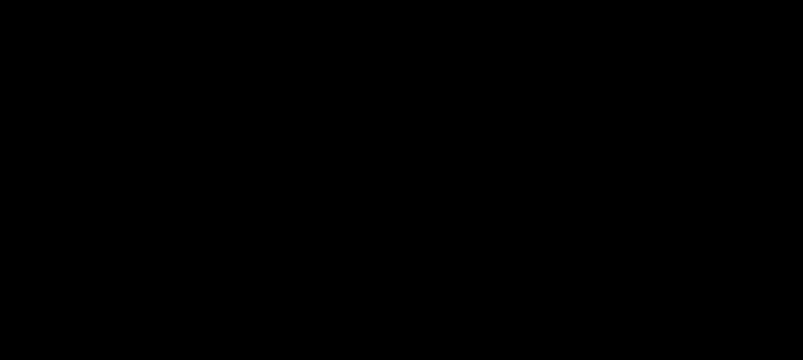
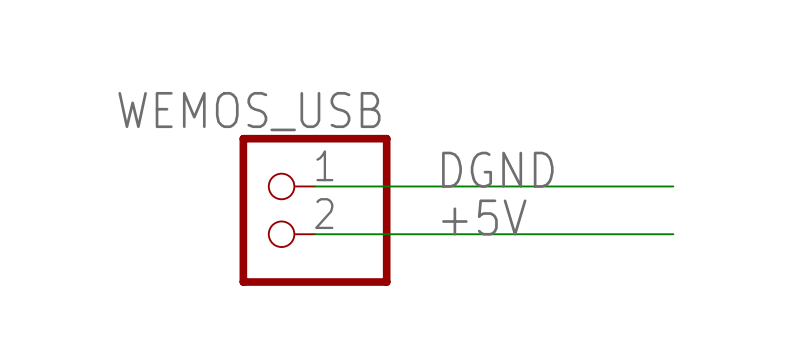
label: none -> DGND (497, 169)
wire: none -> (315, 186) (673, 186)
WEMOS_USB: none -> (315, 210)
label: none -> +5V (484, 217)
wire: none -> (315, 234) (673, 234)

